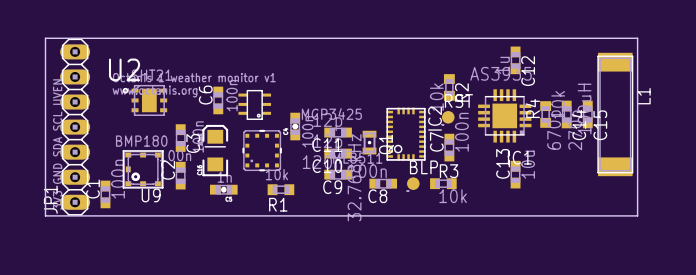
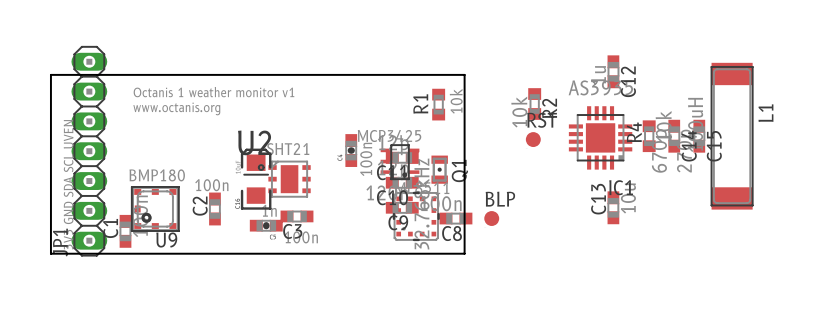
board edge: (45, 38) (637, 38) (637, 215) (45, 215) (45, 38) -> none
board edge: none -> (50, 74) (464, 74) (464, 253) (50, 253) (50, 74)
U2 position: (144, 100) -> (284, 179)
C6: 100n (218, 100) -> none
part position: (254, 104) -> (400, 162)
IC2: (406, 134) -> none
C3 rotation: 0° (180, 138) -> 90° clockwise (296, 216)
C3 position: (180, 138) -> (296, 216)
C7: 100n (449, 147) -> none
part position: (262, 150) -> (416, 216)
U9 position: (143, 169) -> (155, 208)
R3: 10k (443, 183) -> none
R1 rotation: 0° (280, 189) -> 90° clockwise (438, 104)
R1 position: (280, 189) -> (438, 104)

